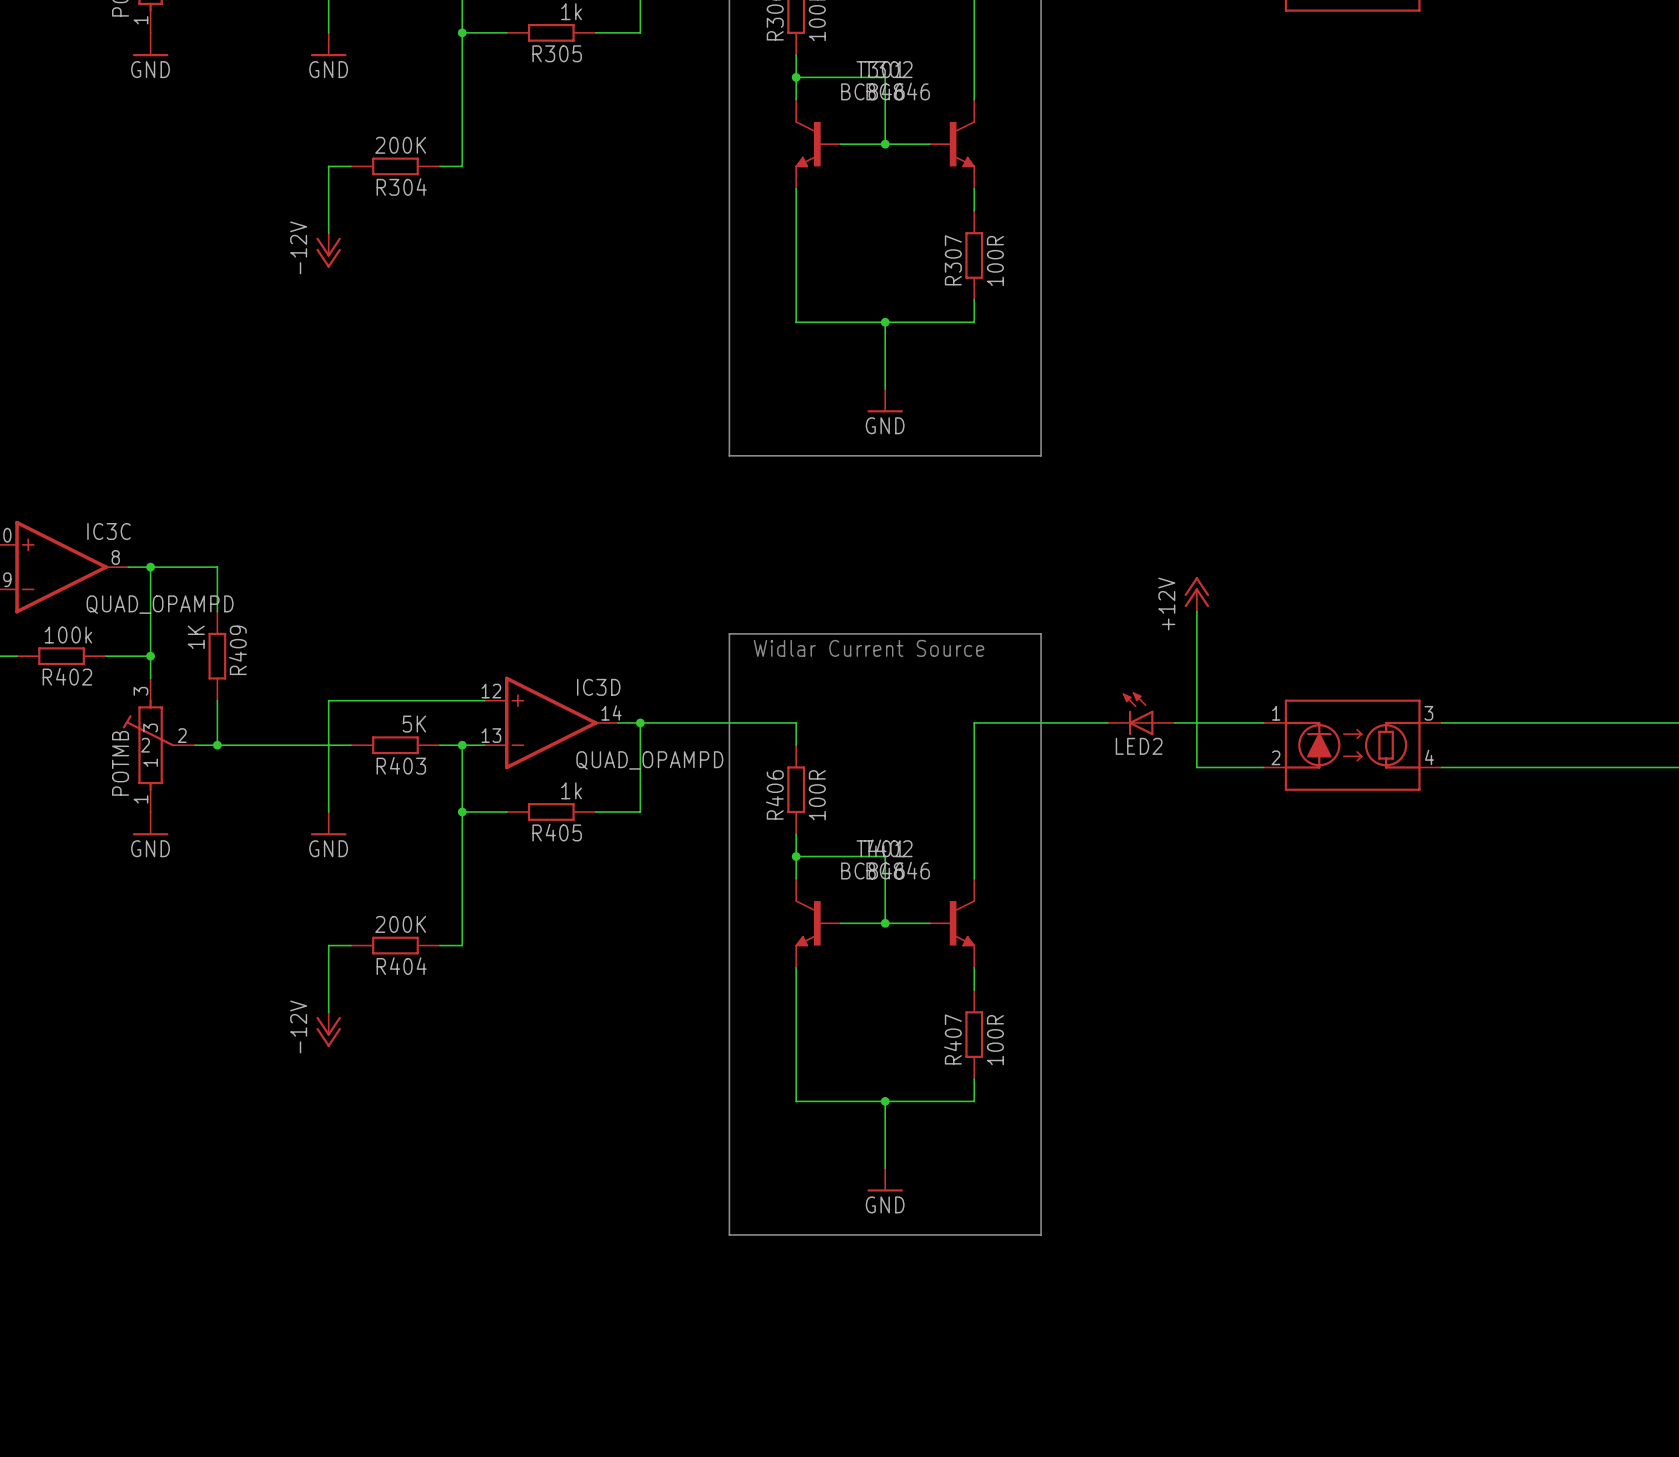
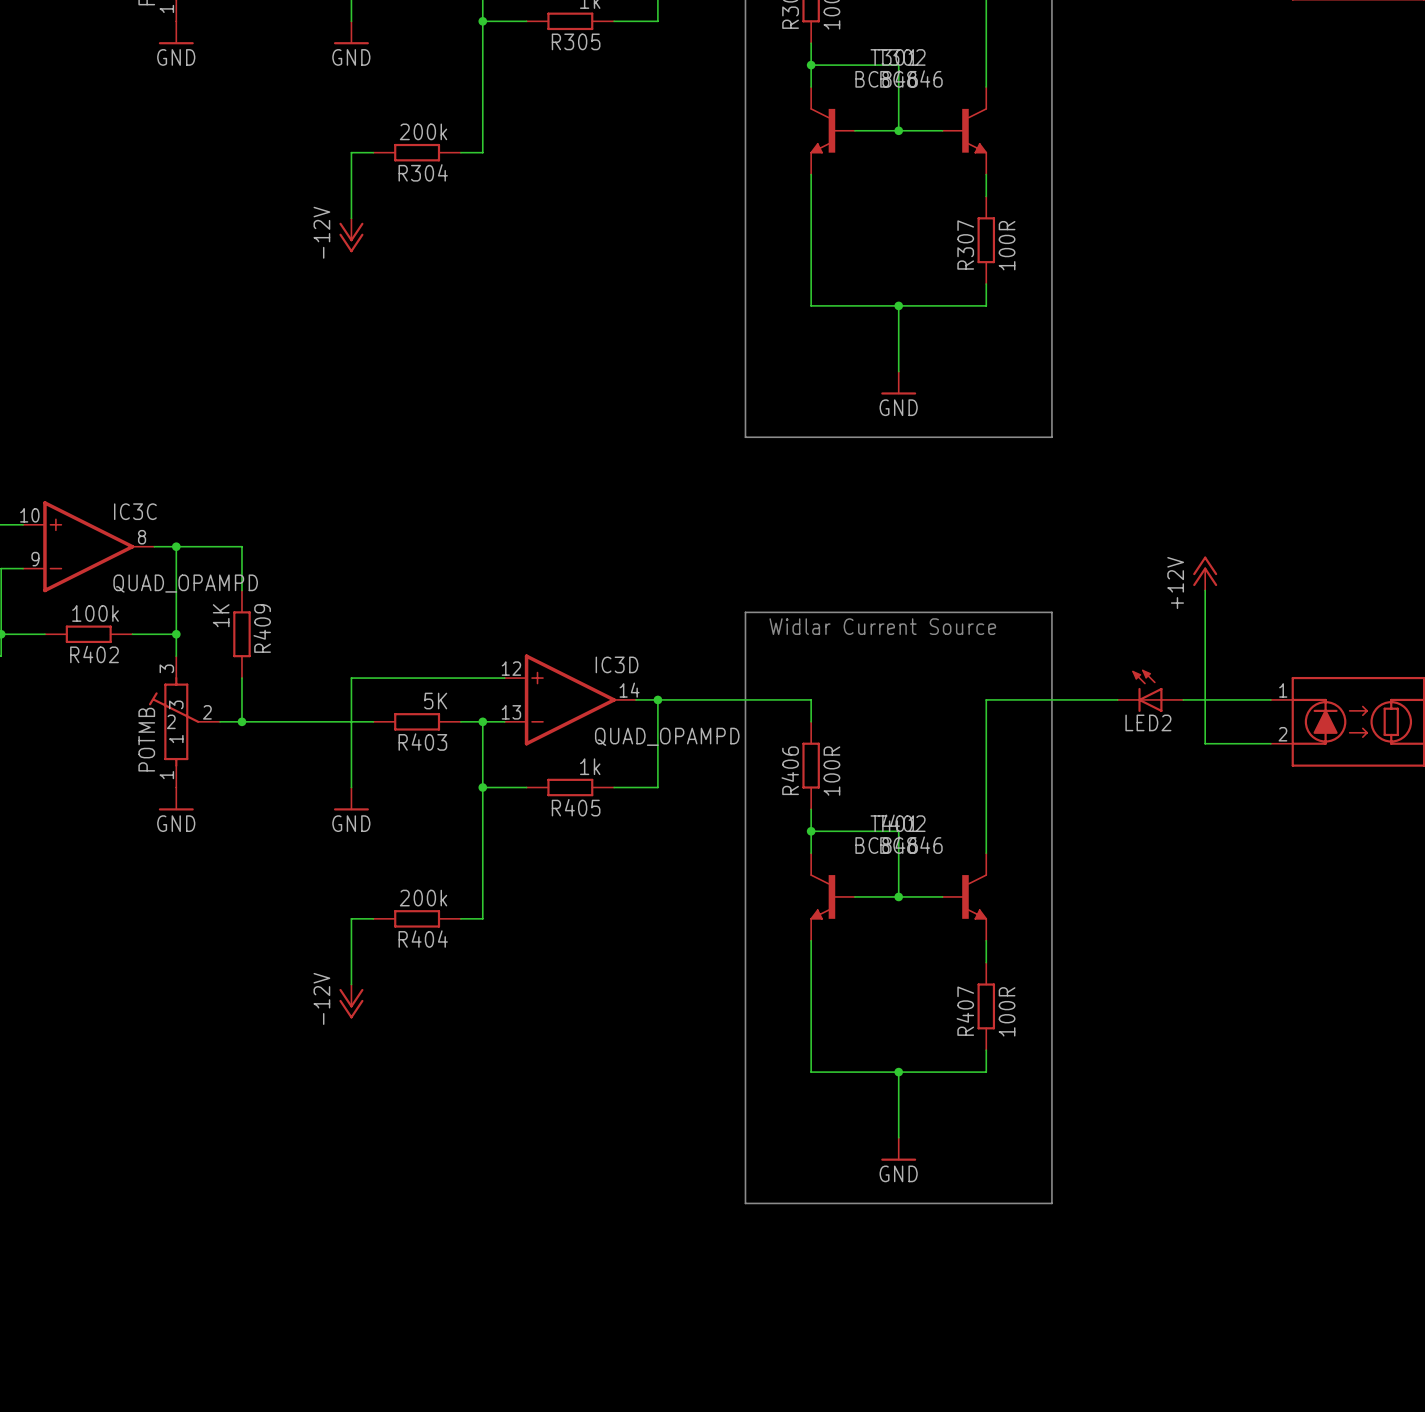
R304 value: 200K (400, 145) -> 200k (423, 131)
R404 value: 200K (400, 924) -> 200k (423, 898)

